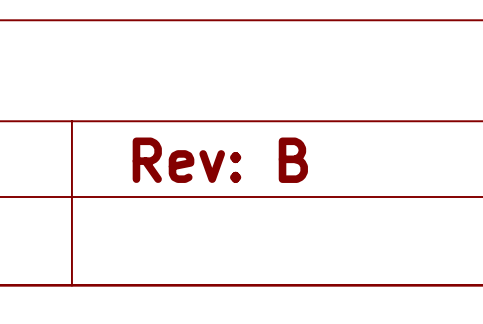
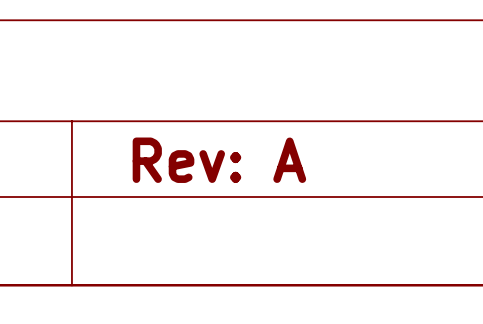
title block: Rev: B (220, 160) -> Rev: A (219, 160)

